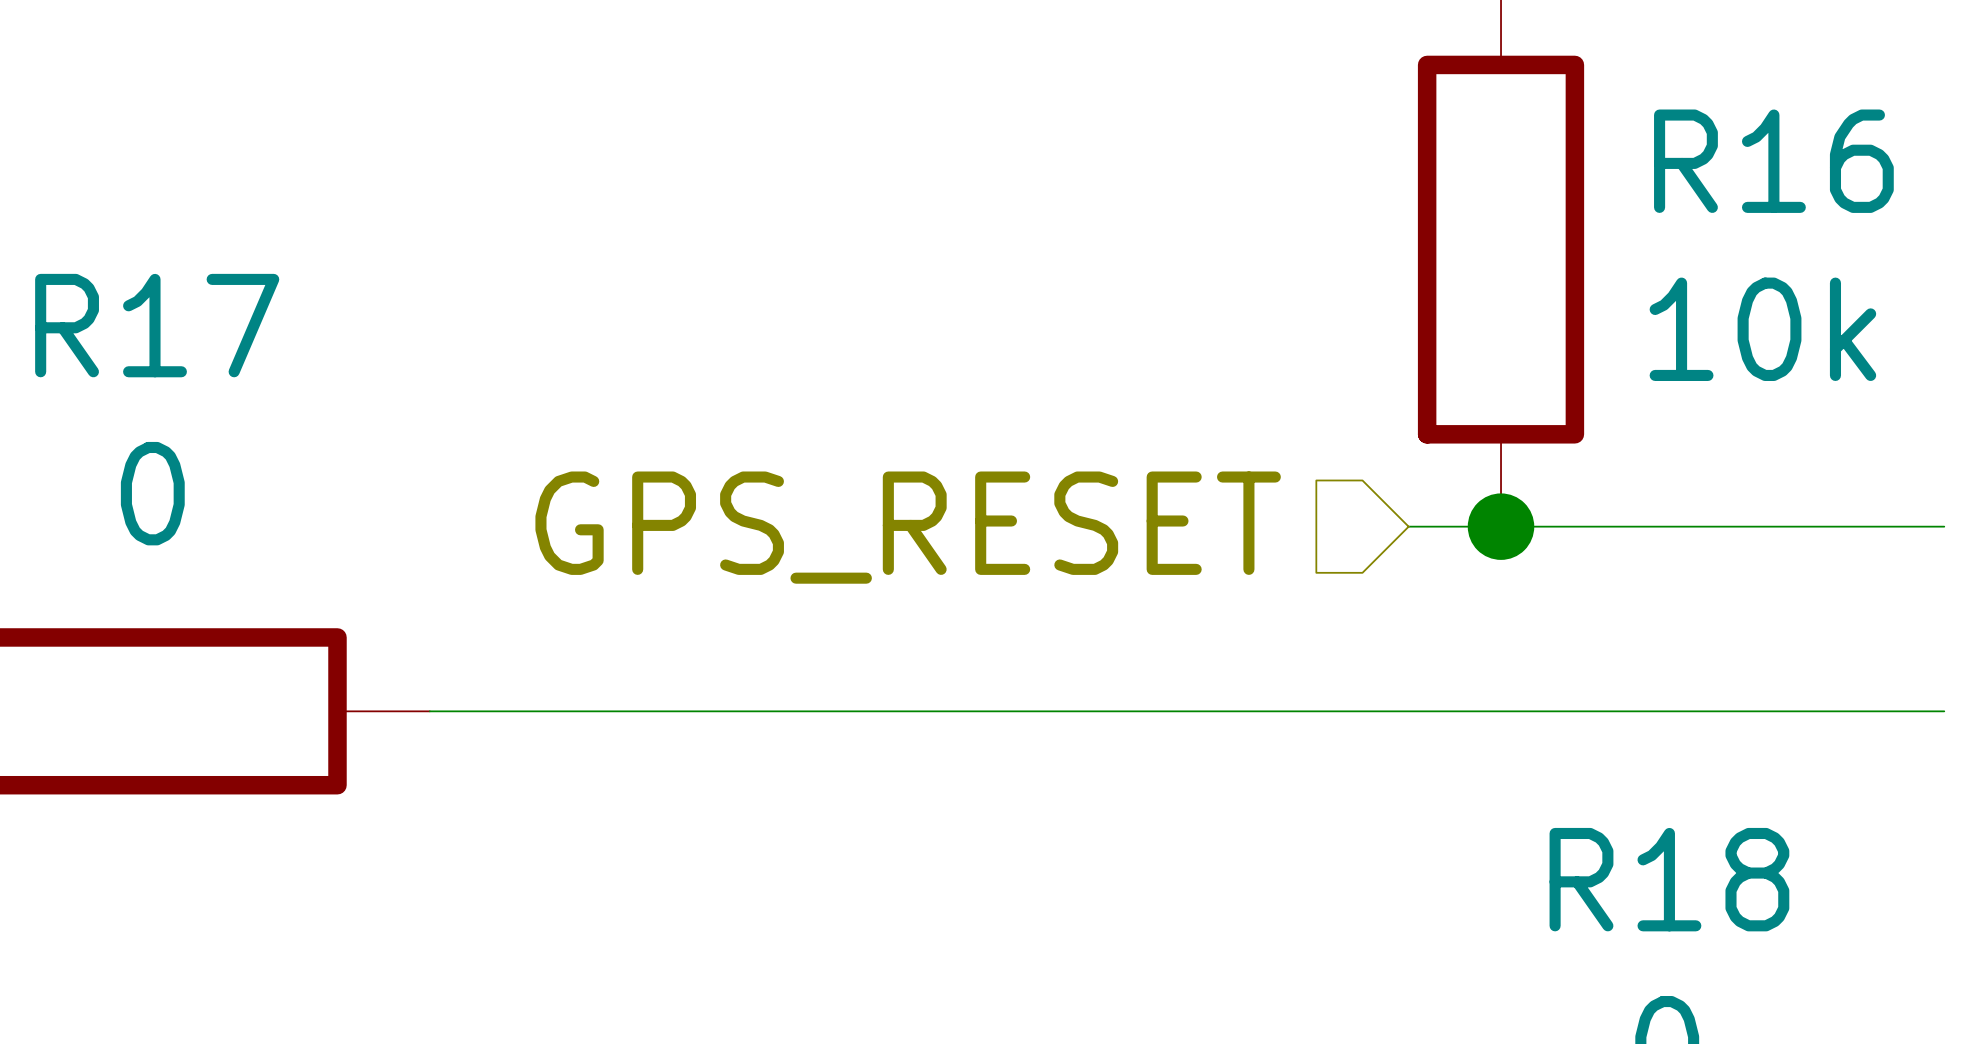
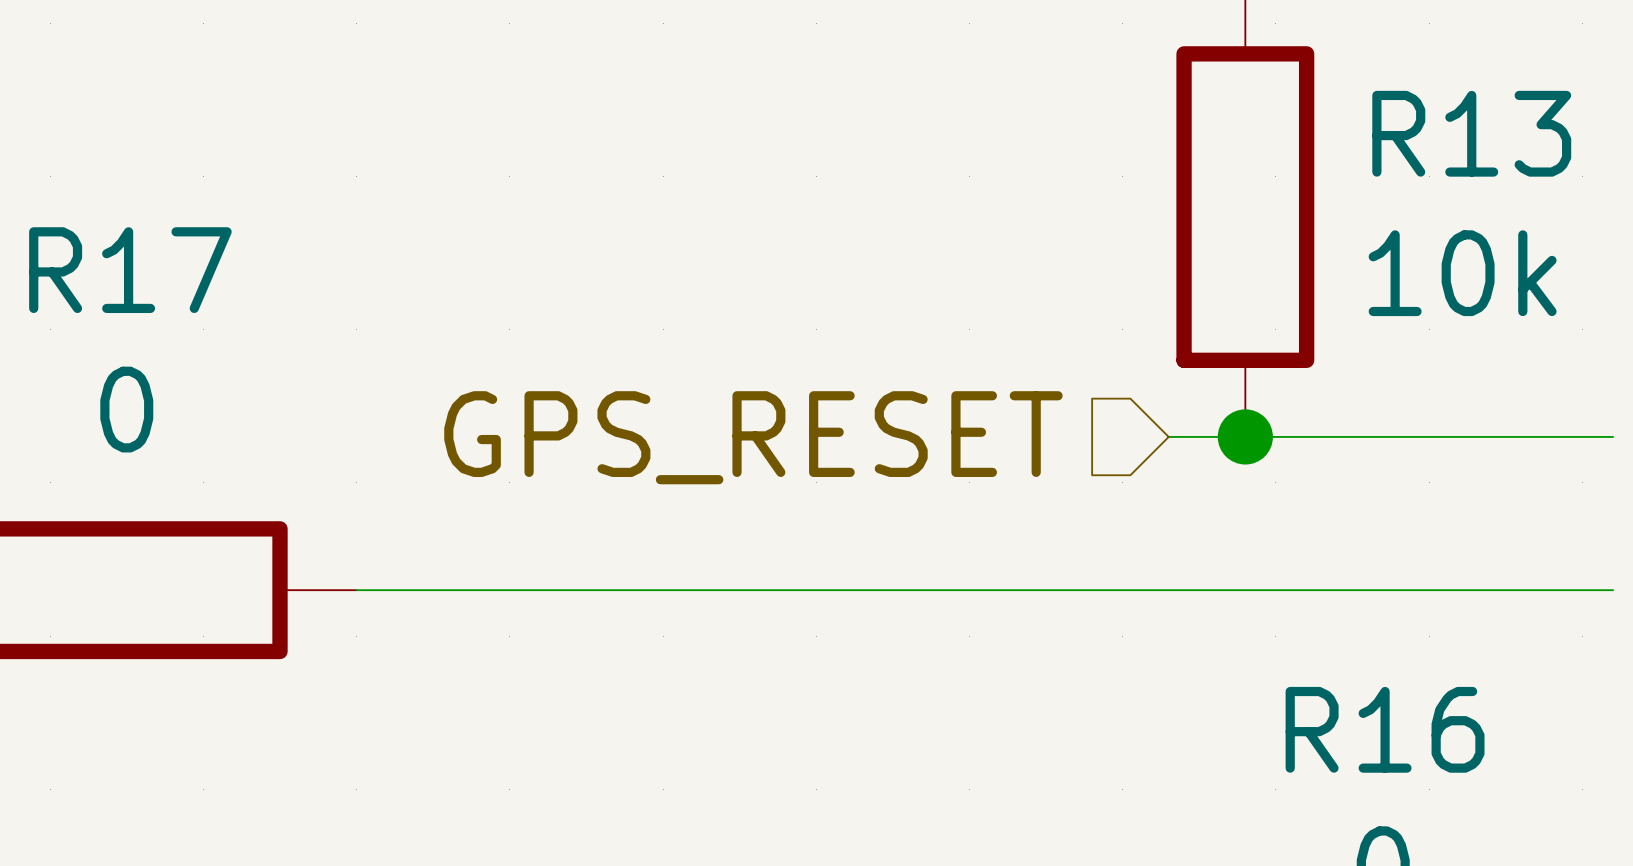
R16 name: R16 (1773, 161) -> R13 (1471, 133)
R18 name: R18 (1669, 879) -> R16 (1385, 729)

